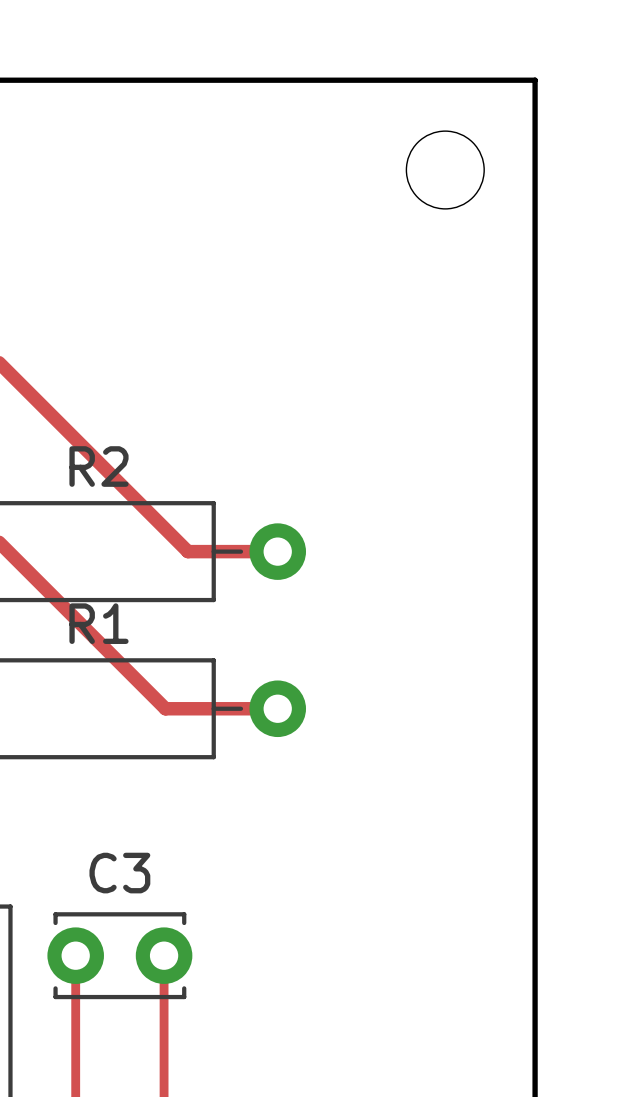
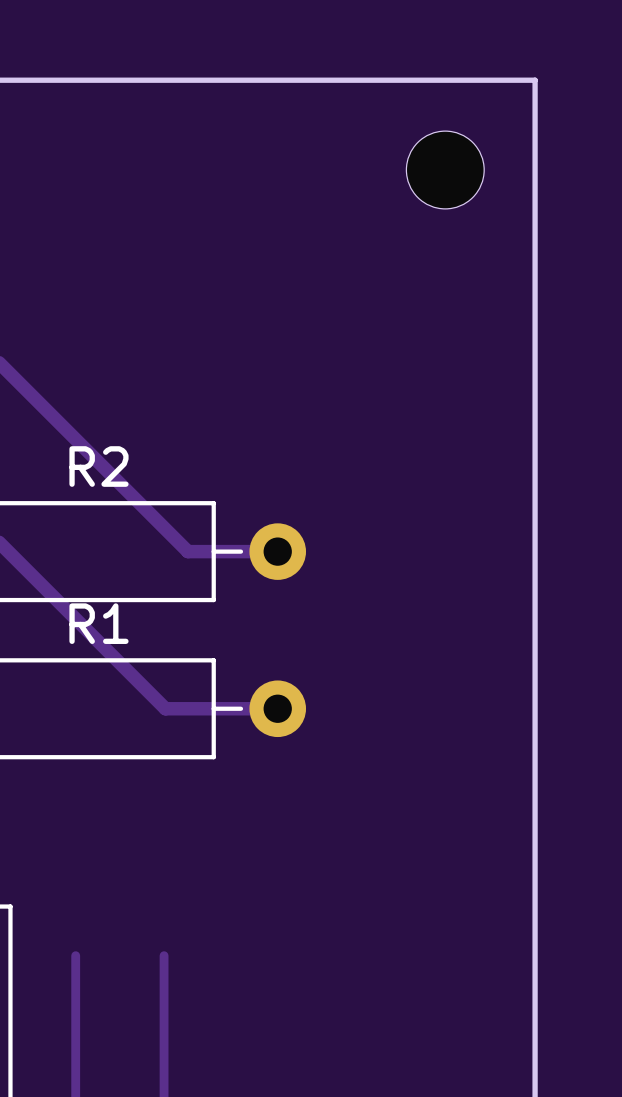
C3: (119, 955) -> none

